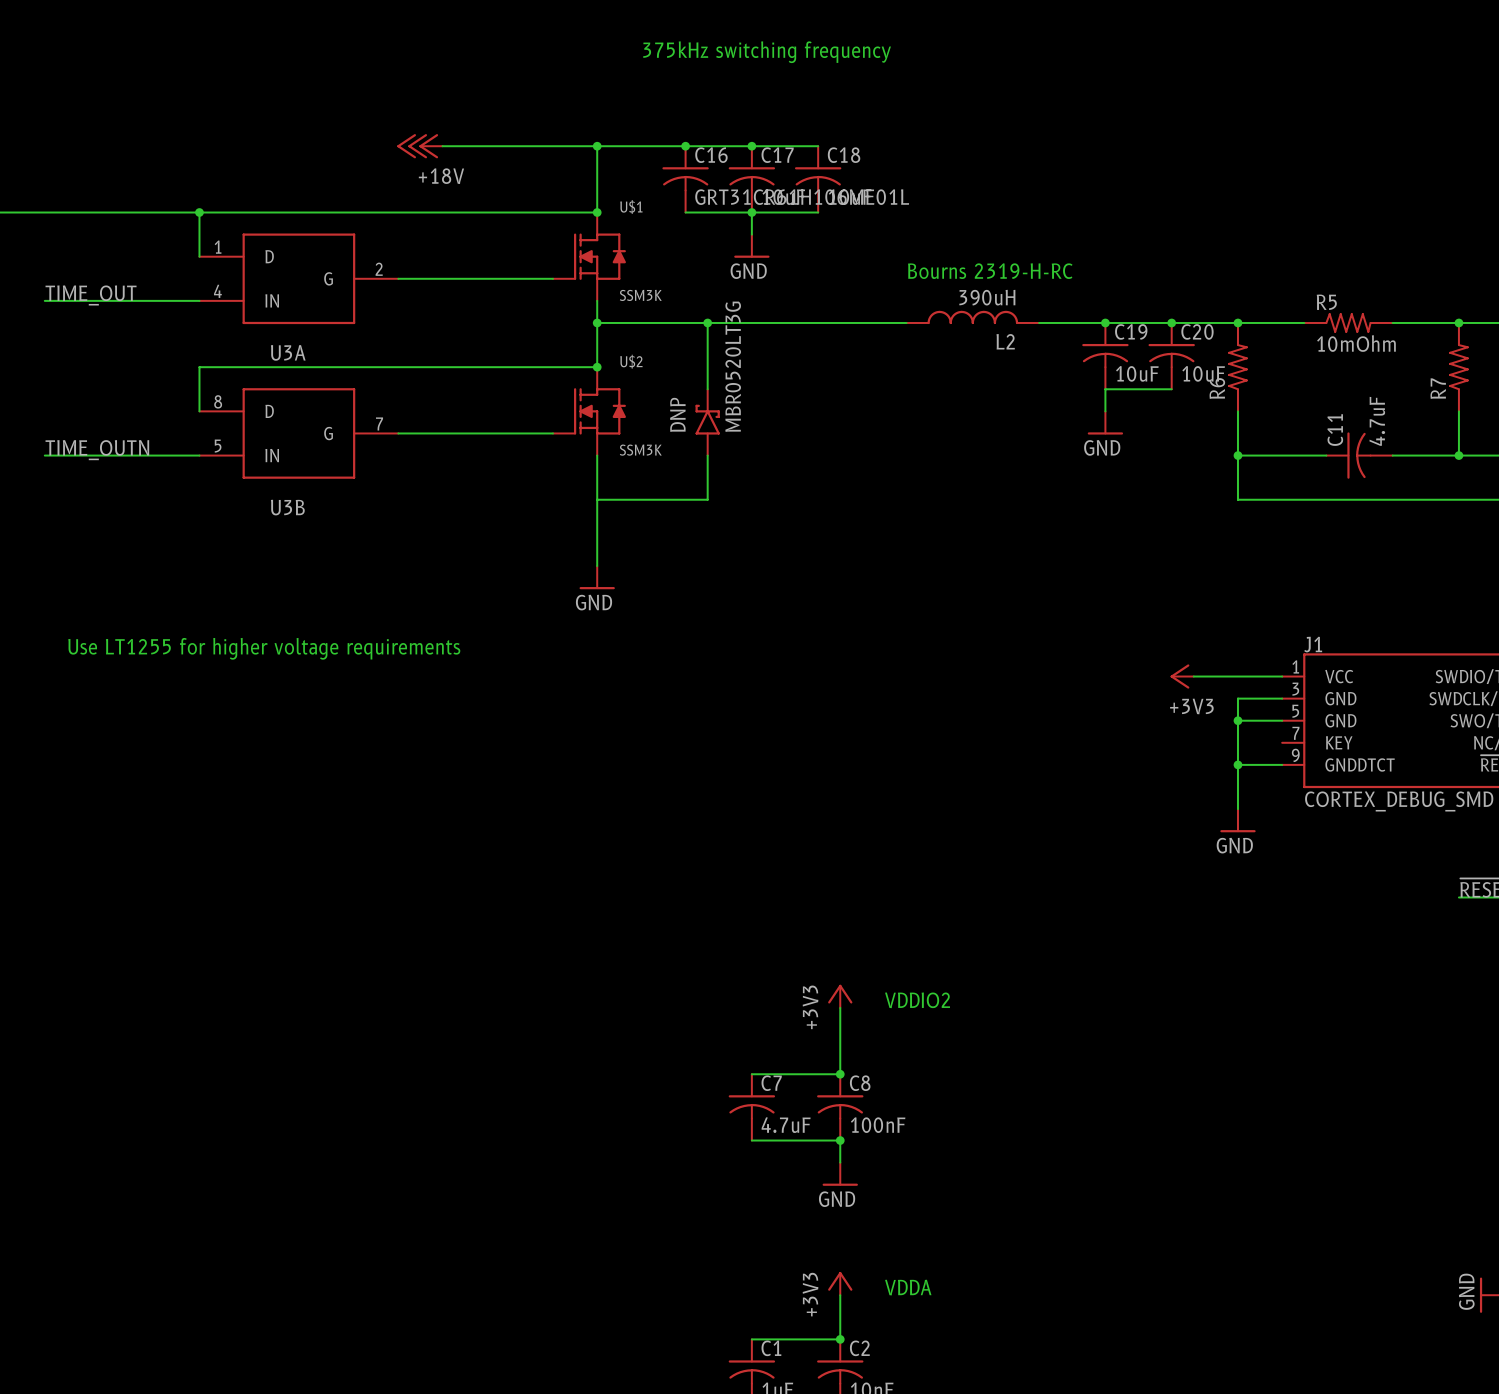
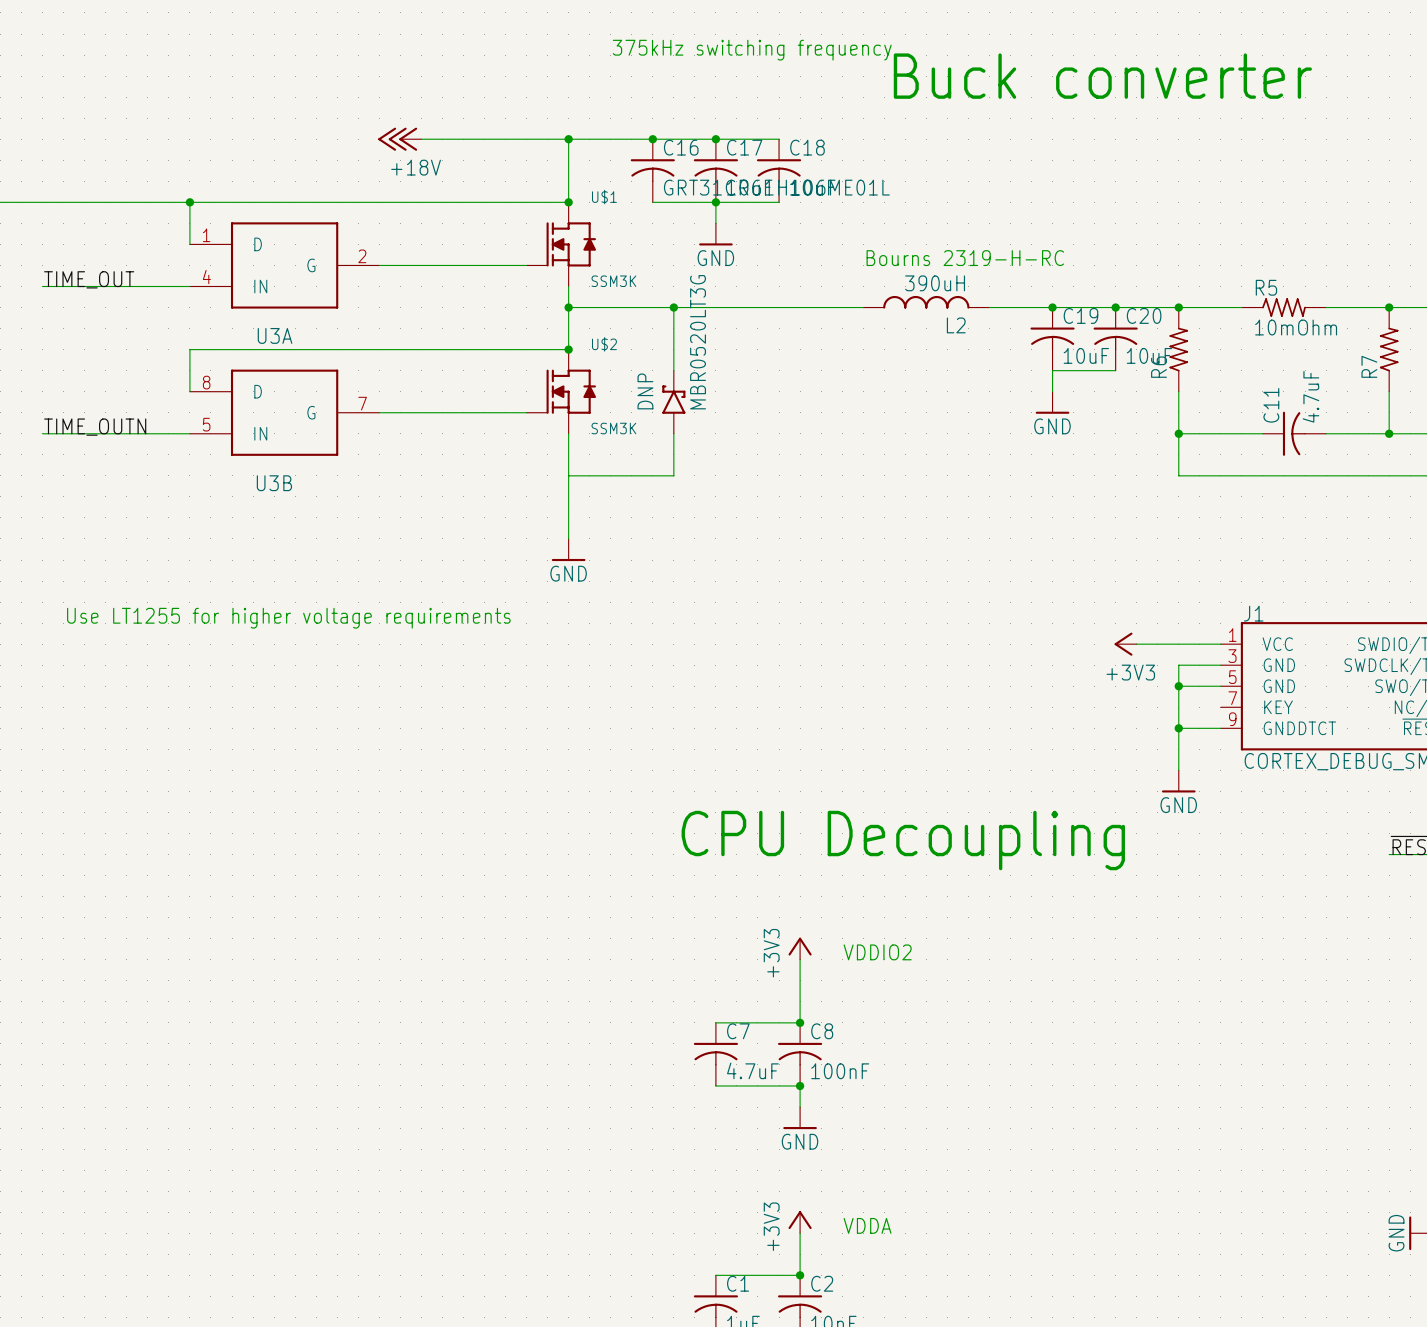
text: none -> Buck converter (1102, 76)
text: none -> CPU Decoupling (903, 840)

